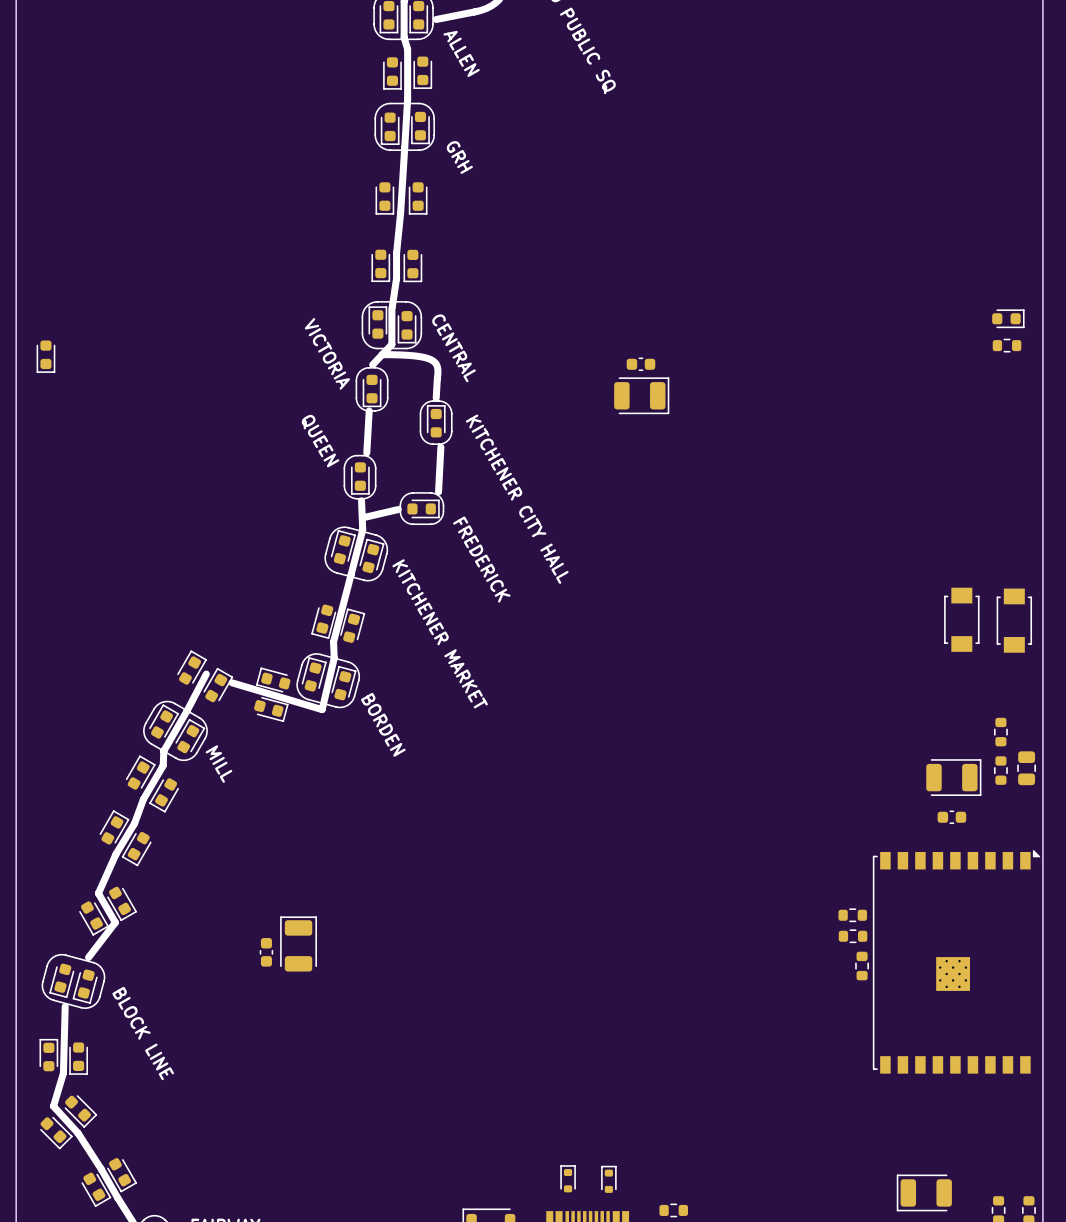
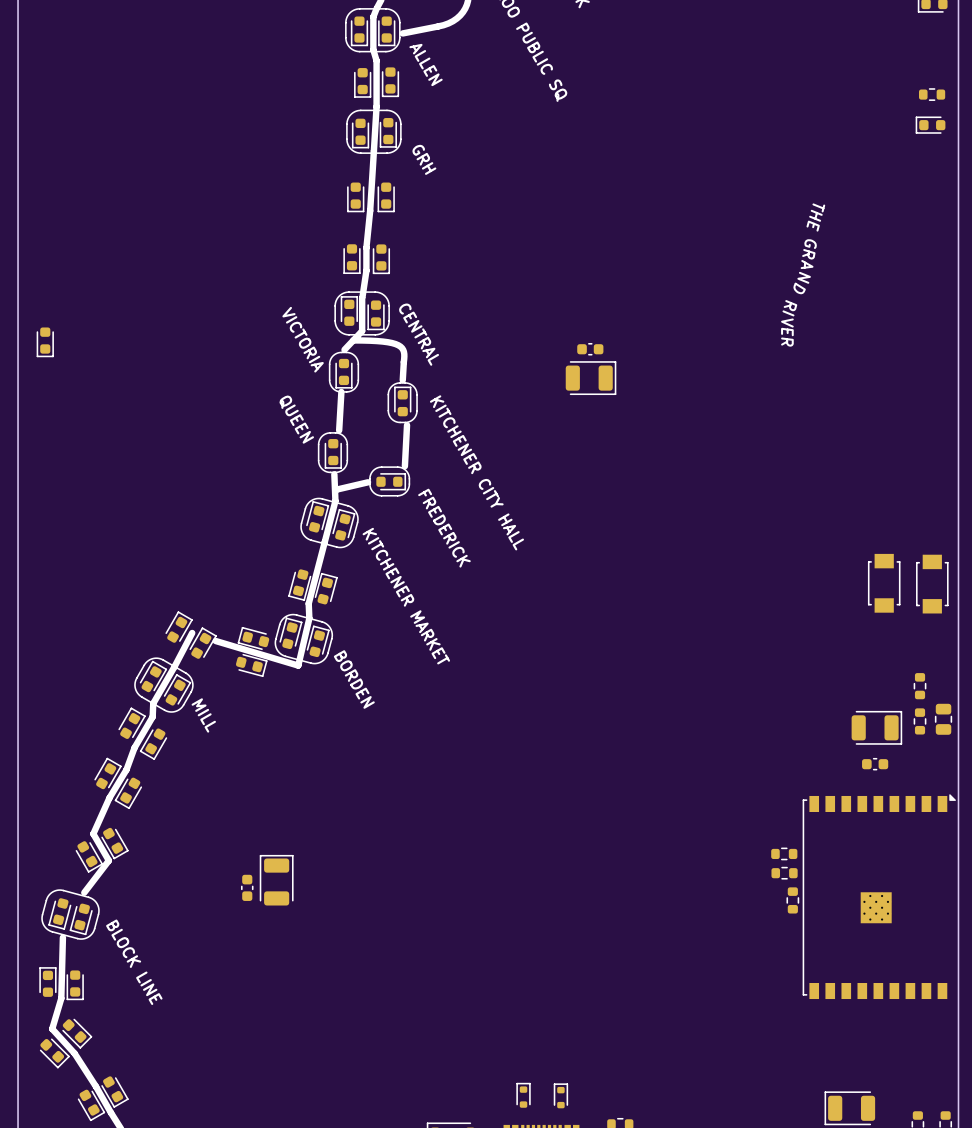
text: none -> THE (815, 217)
text: none -> GR (809, 249)
text: none -> A (807, 264)
text: none -> N (804, 277)
text: none -> D (799, 288)
part rotation: 0° (1008, 318) -> 180° (930, 125)
part position: (1008, 318) -> (930, 125)
text: none -> RI (789, 308)
part position: (1007, 345) -> (932, 94)
text: none -> VER (787, 332)

